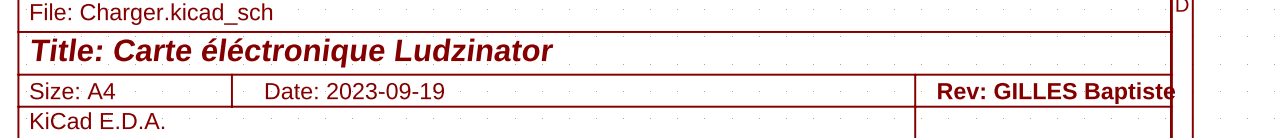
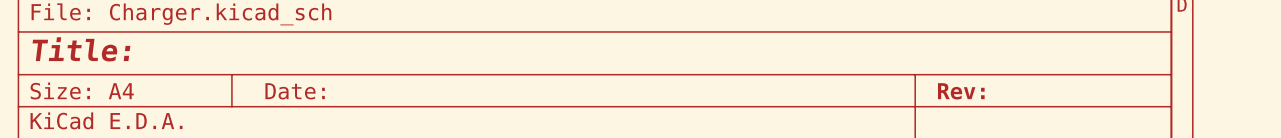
title block: Title: Carte éléctronique Ludzinator (292, 52) -> Title: (81, 49)
title block: Date: 2023-09-19 (354, 91) -> Date: (295, 91)
title block: Rev: GILLES Baptiste (1056, 93) -> Rev: (961, 91)

